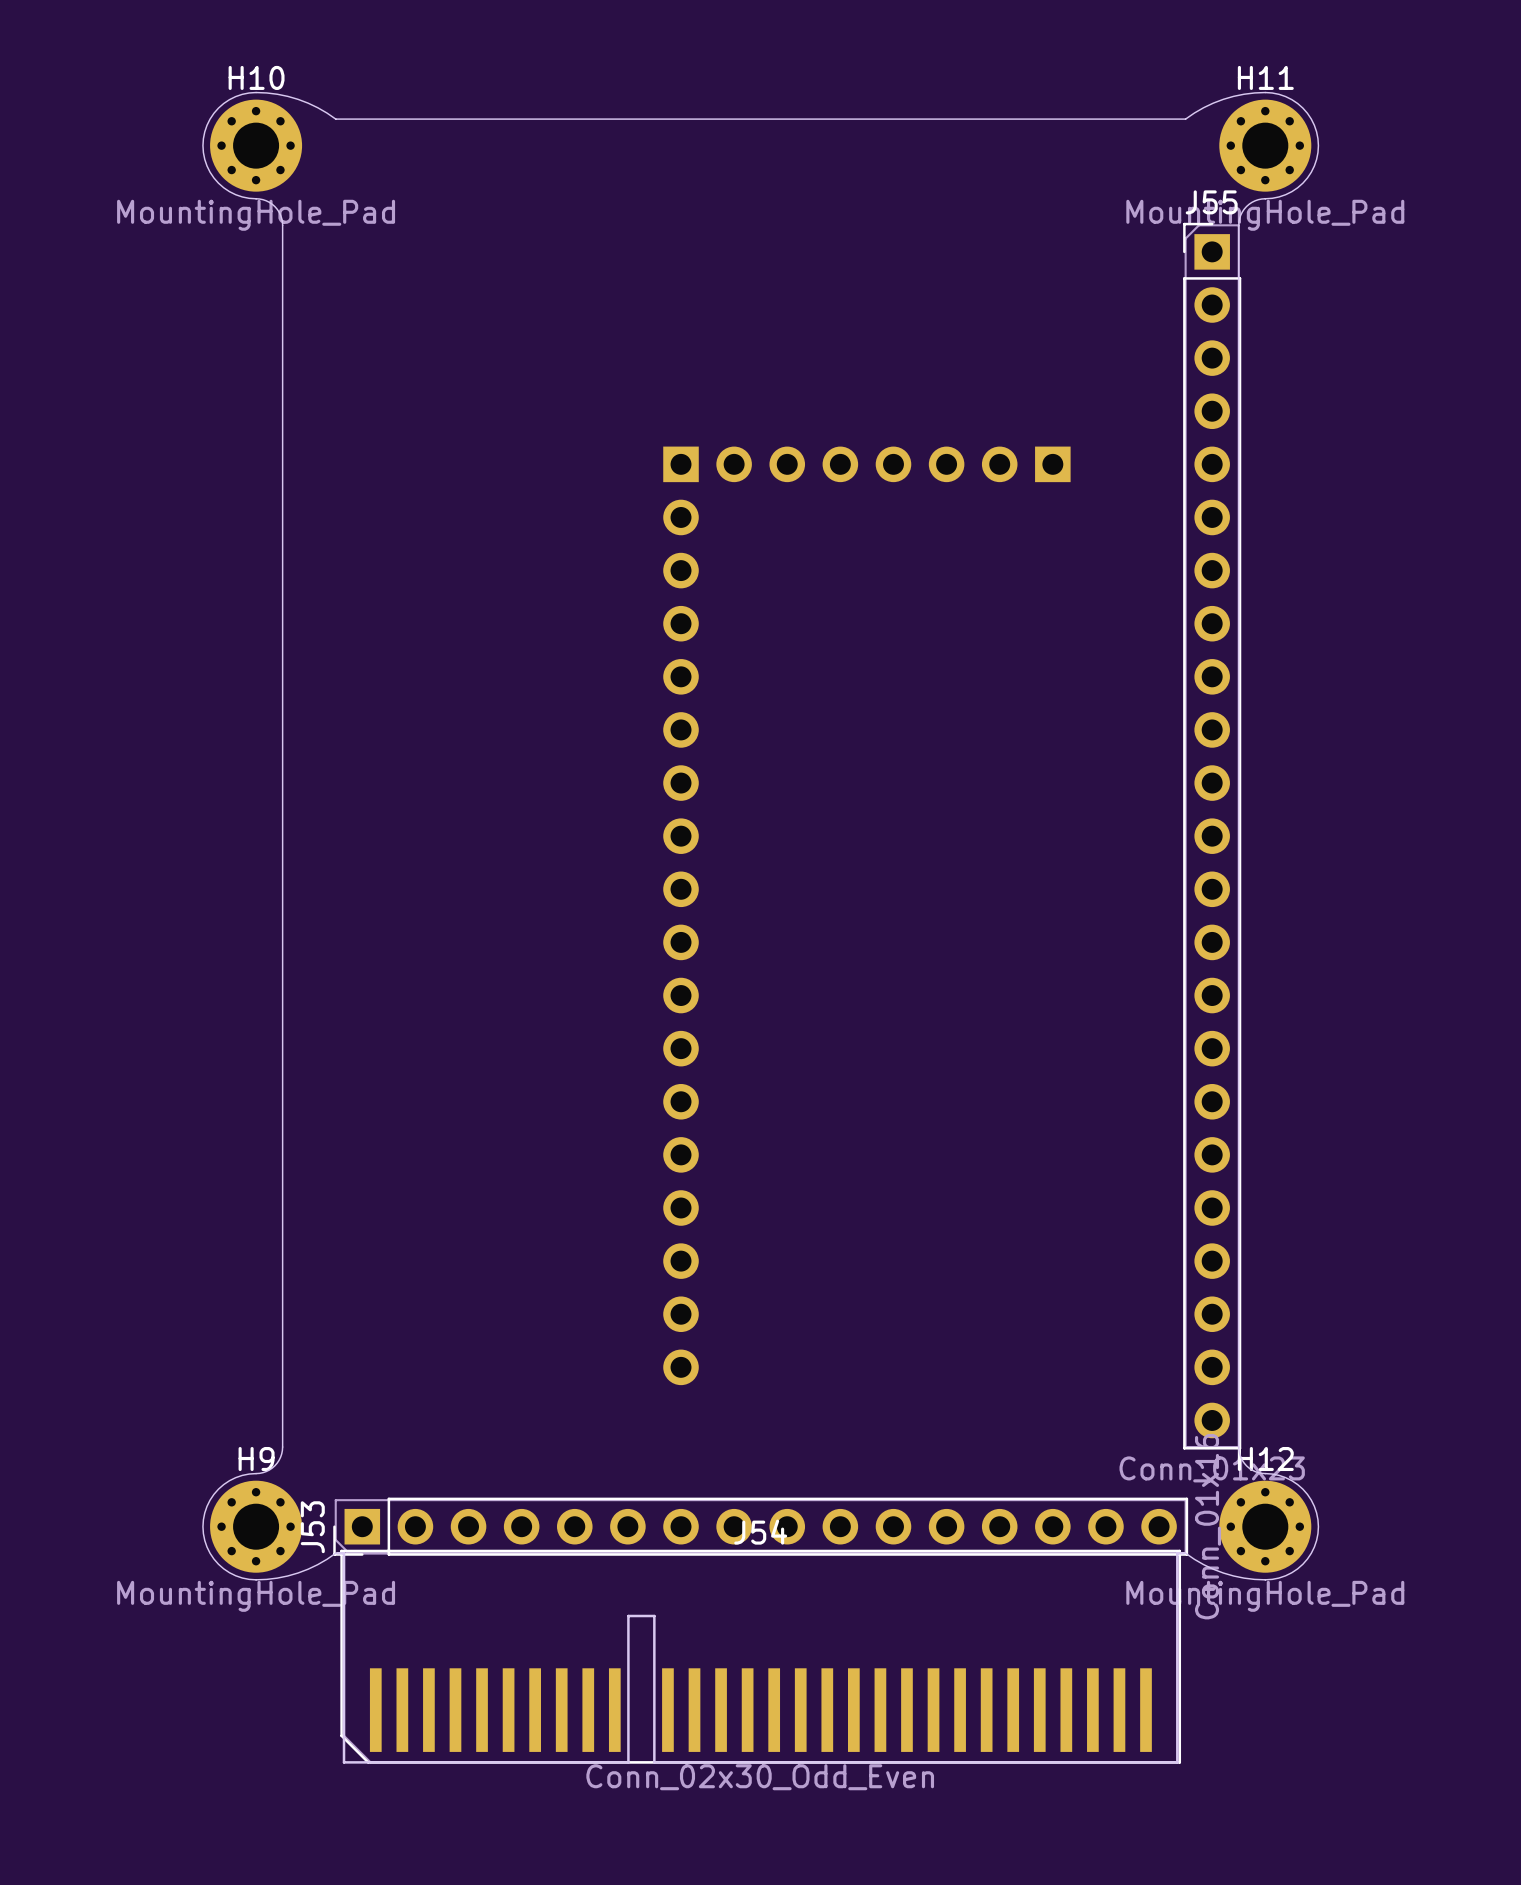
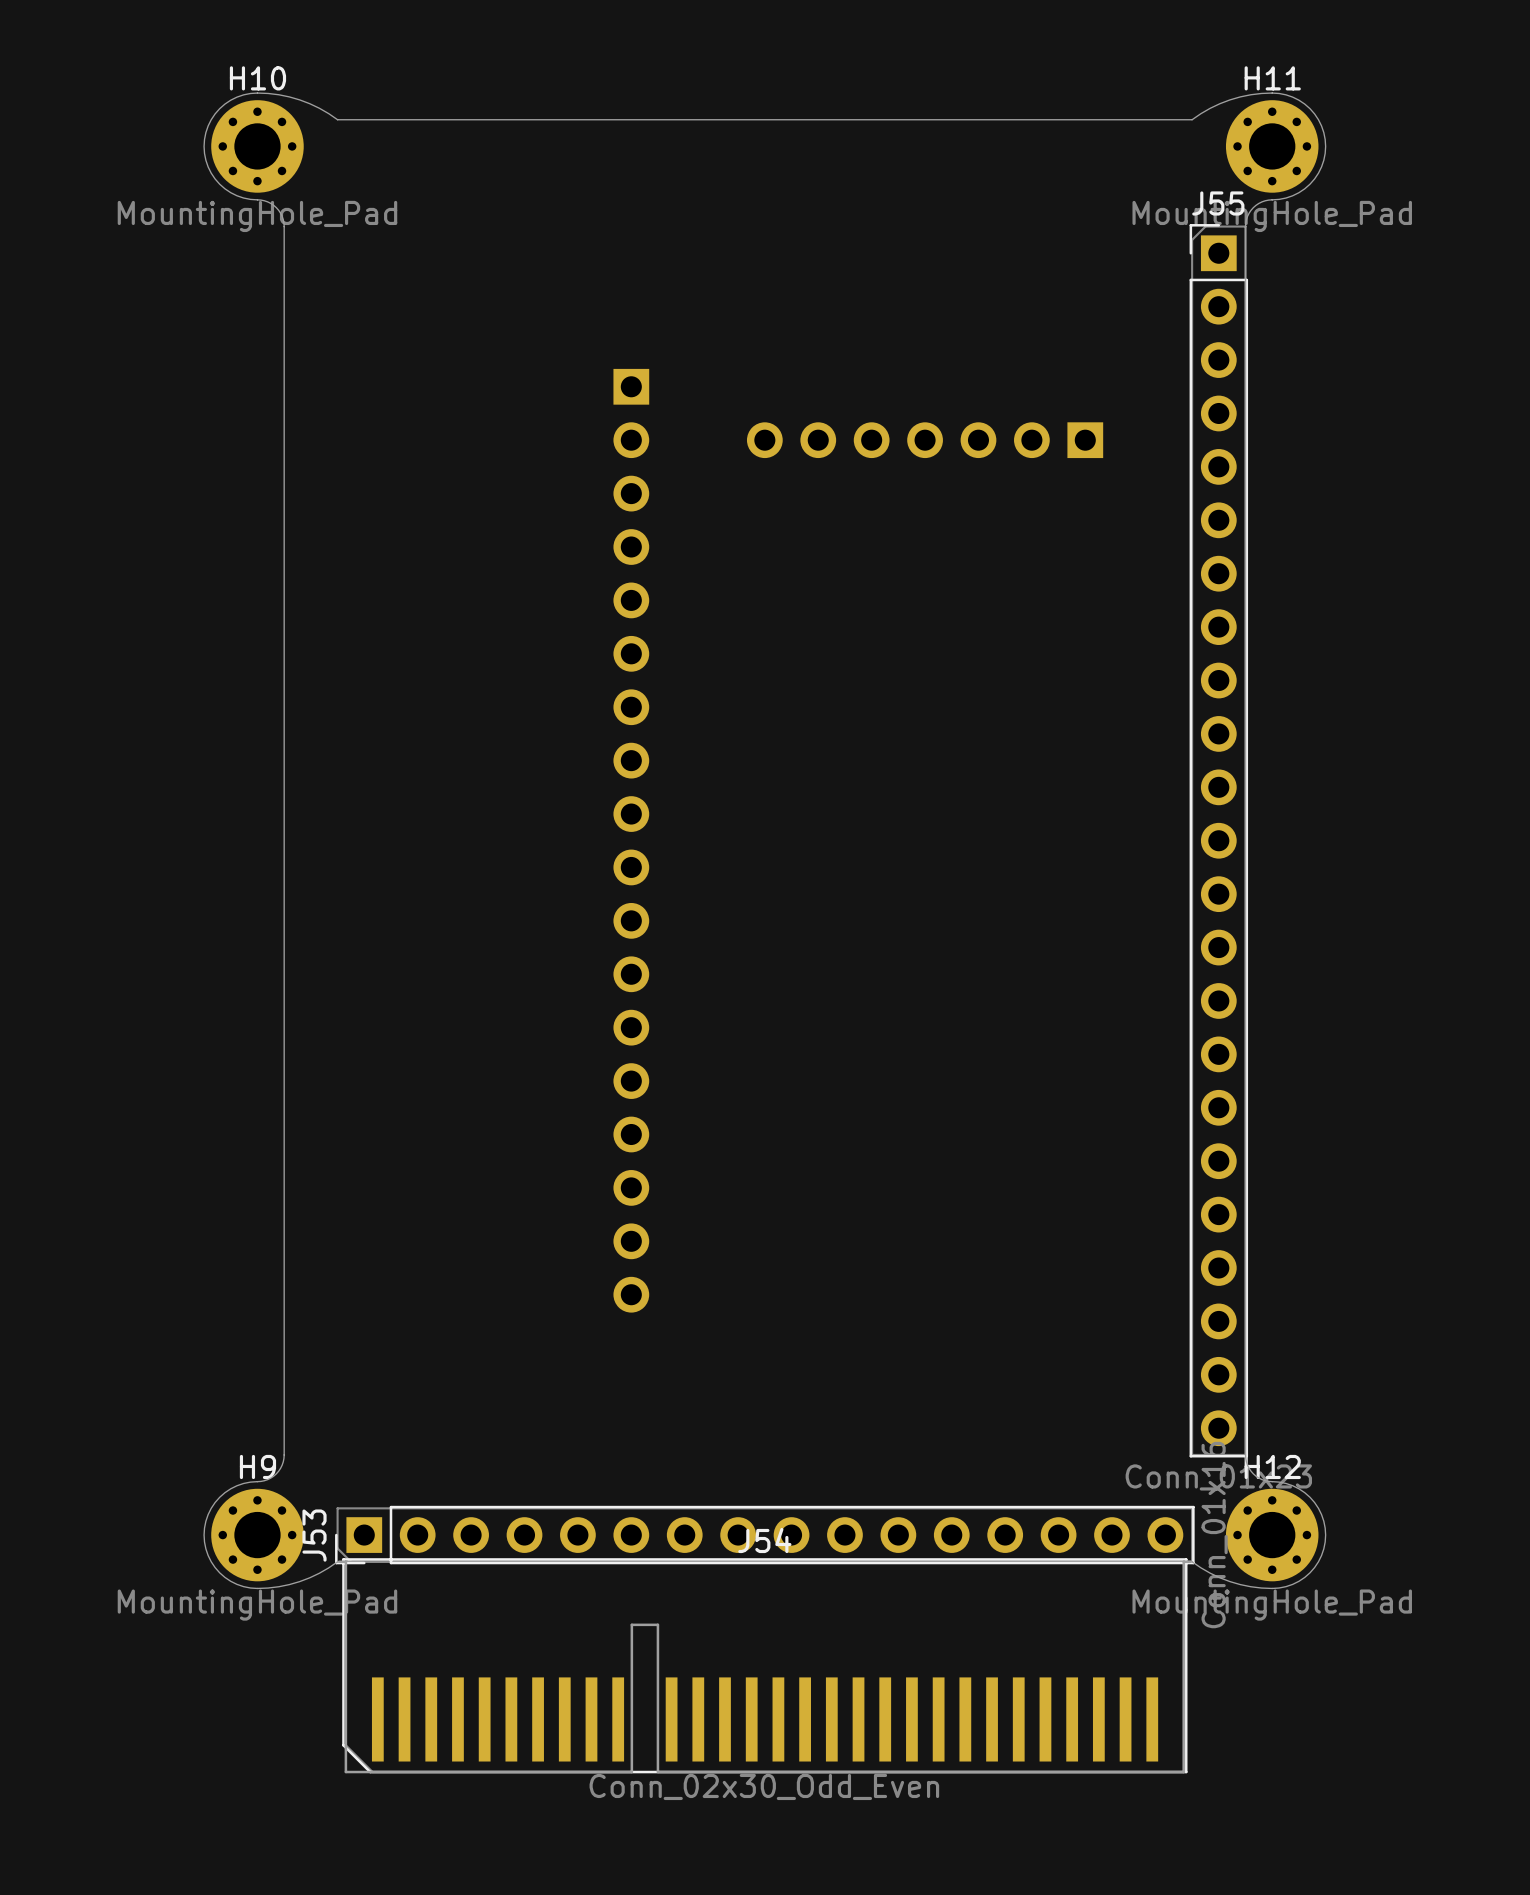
part position: (893, 464) -> (925, 440)
part position: (681, 915) -> (631, 840)

